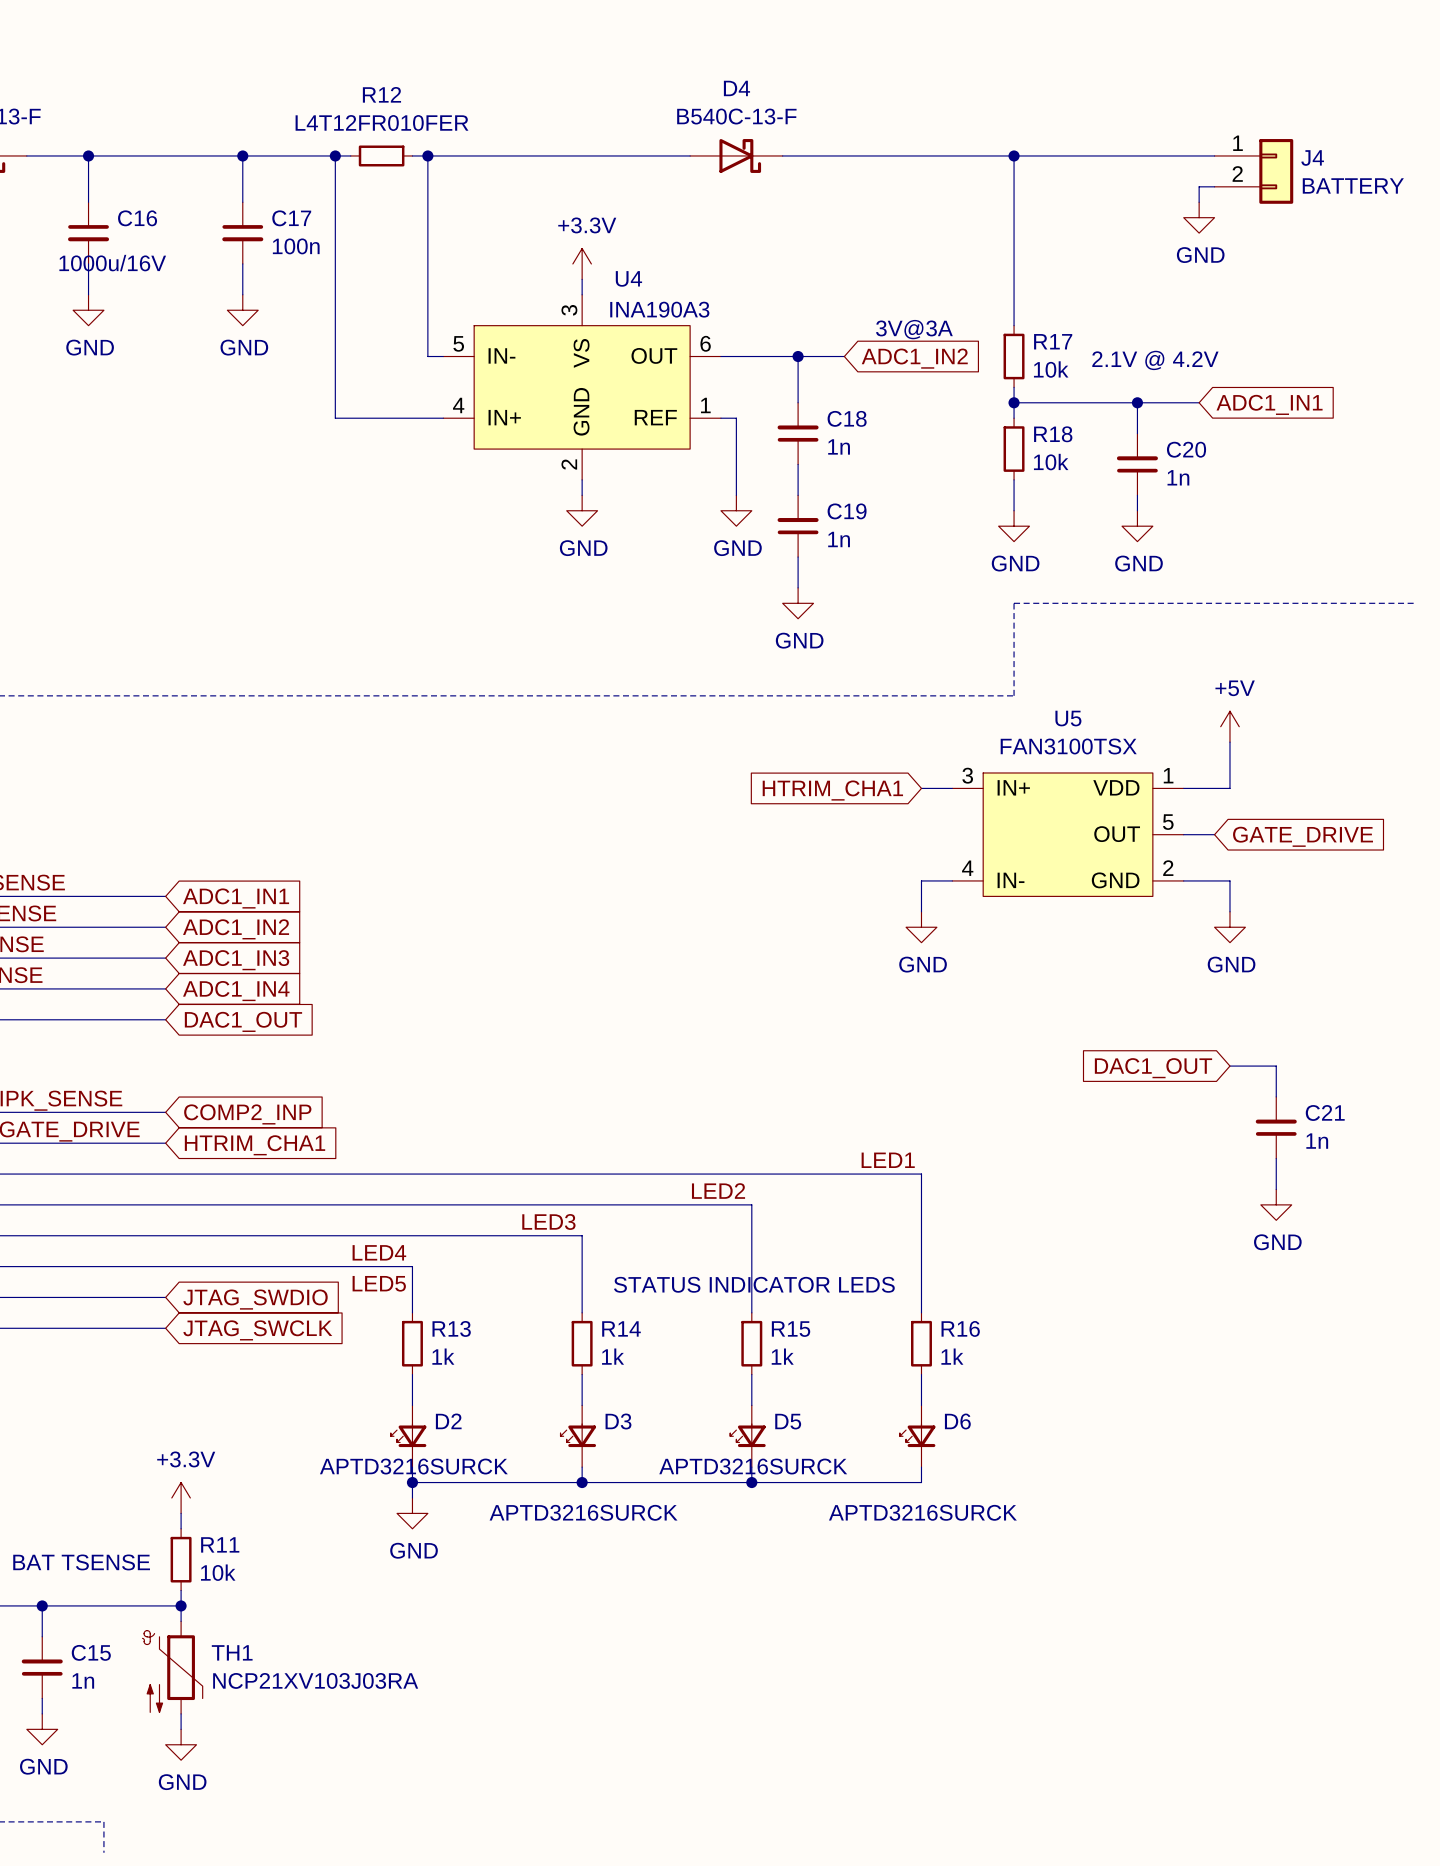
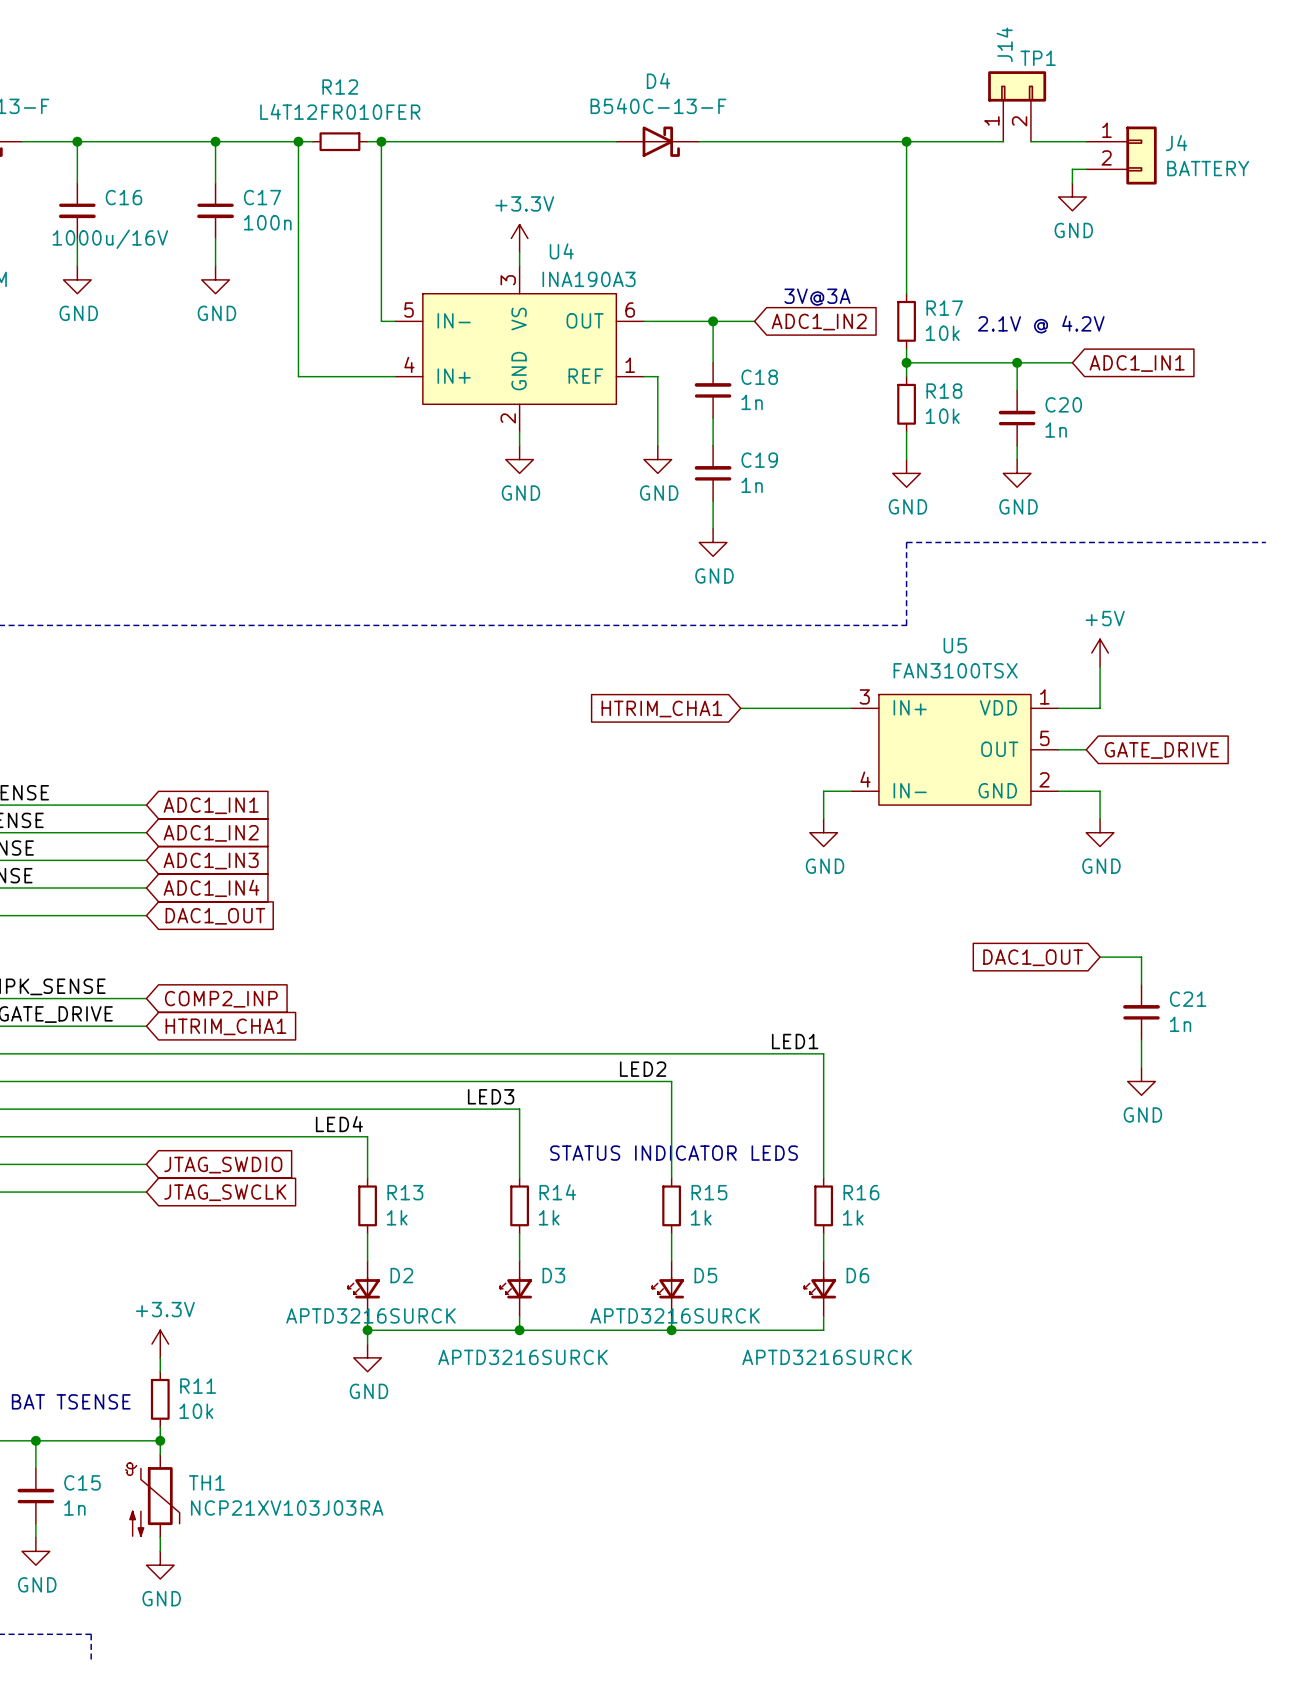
J14: none -> TP1 (1017, 106)
wire: (1122, 155) (1152, 155) -> none
wire: none -> (740, 708) (823, 708)
global label position: HTRIM_CHA1 (832, 790) -> HTRIM_CHA1 (661, 708)
label: LED5 (379, 1283) -> none

